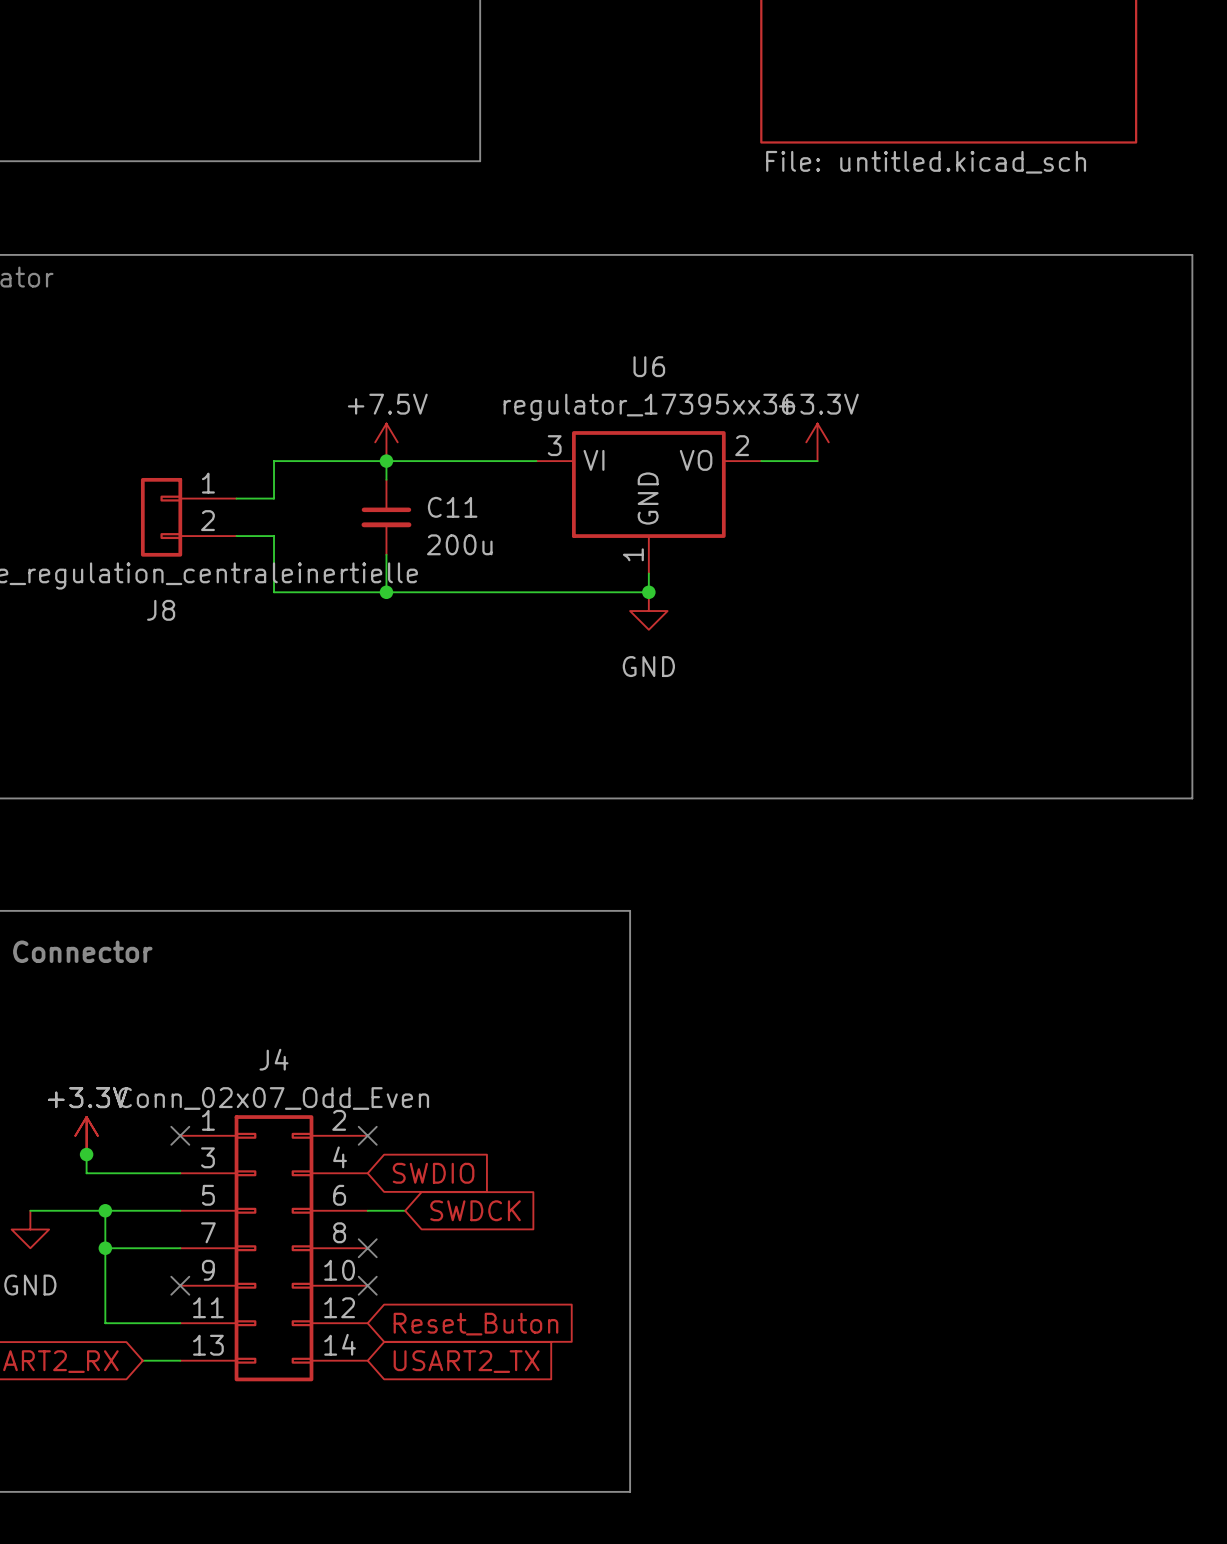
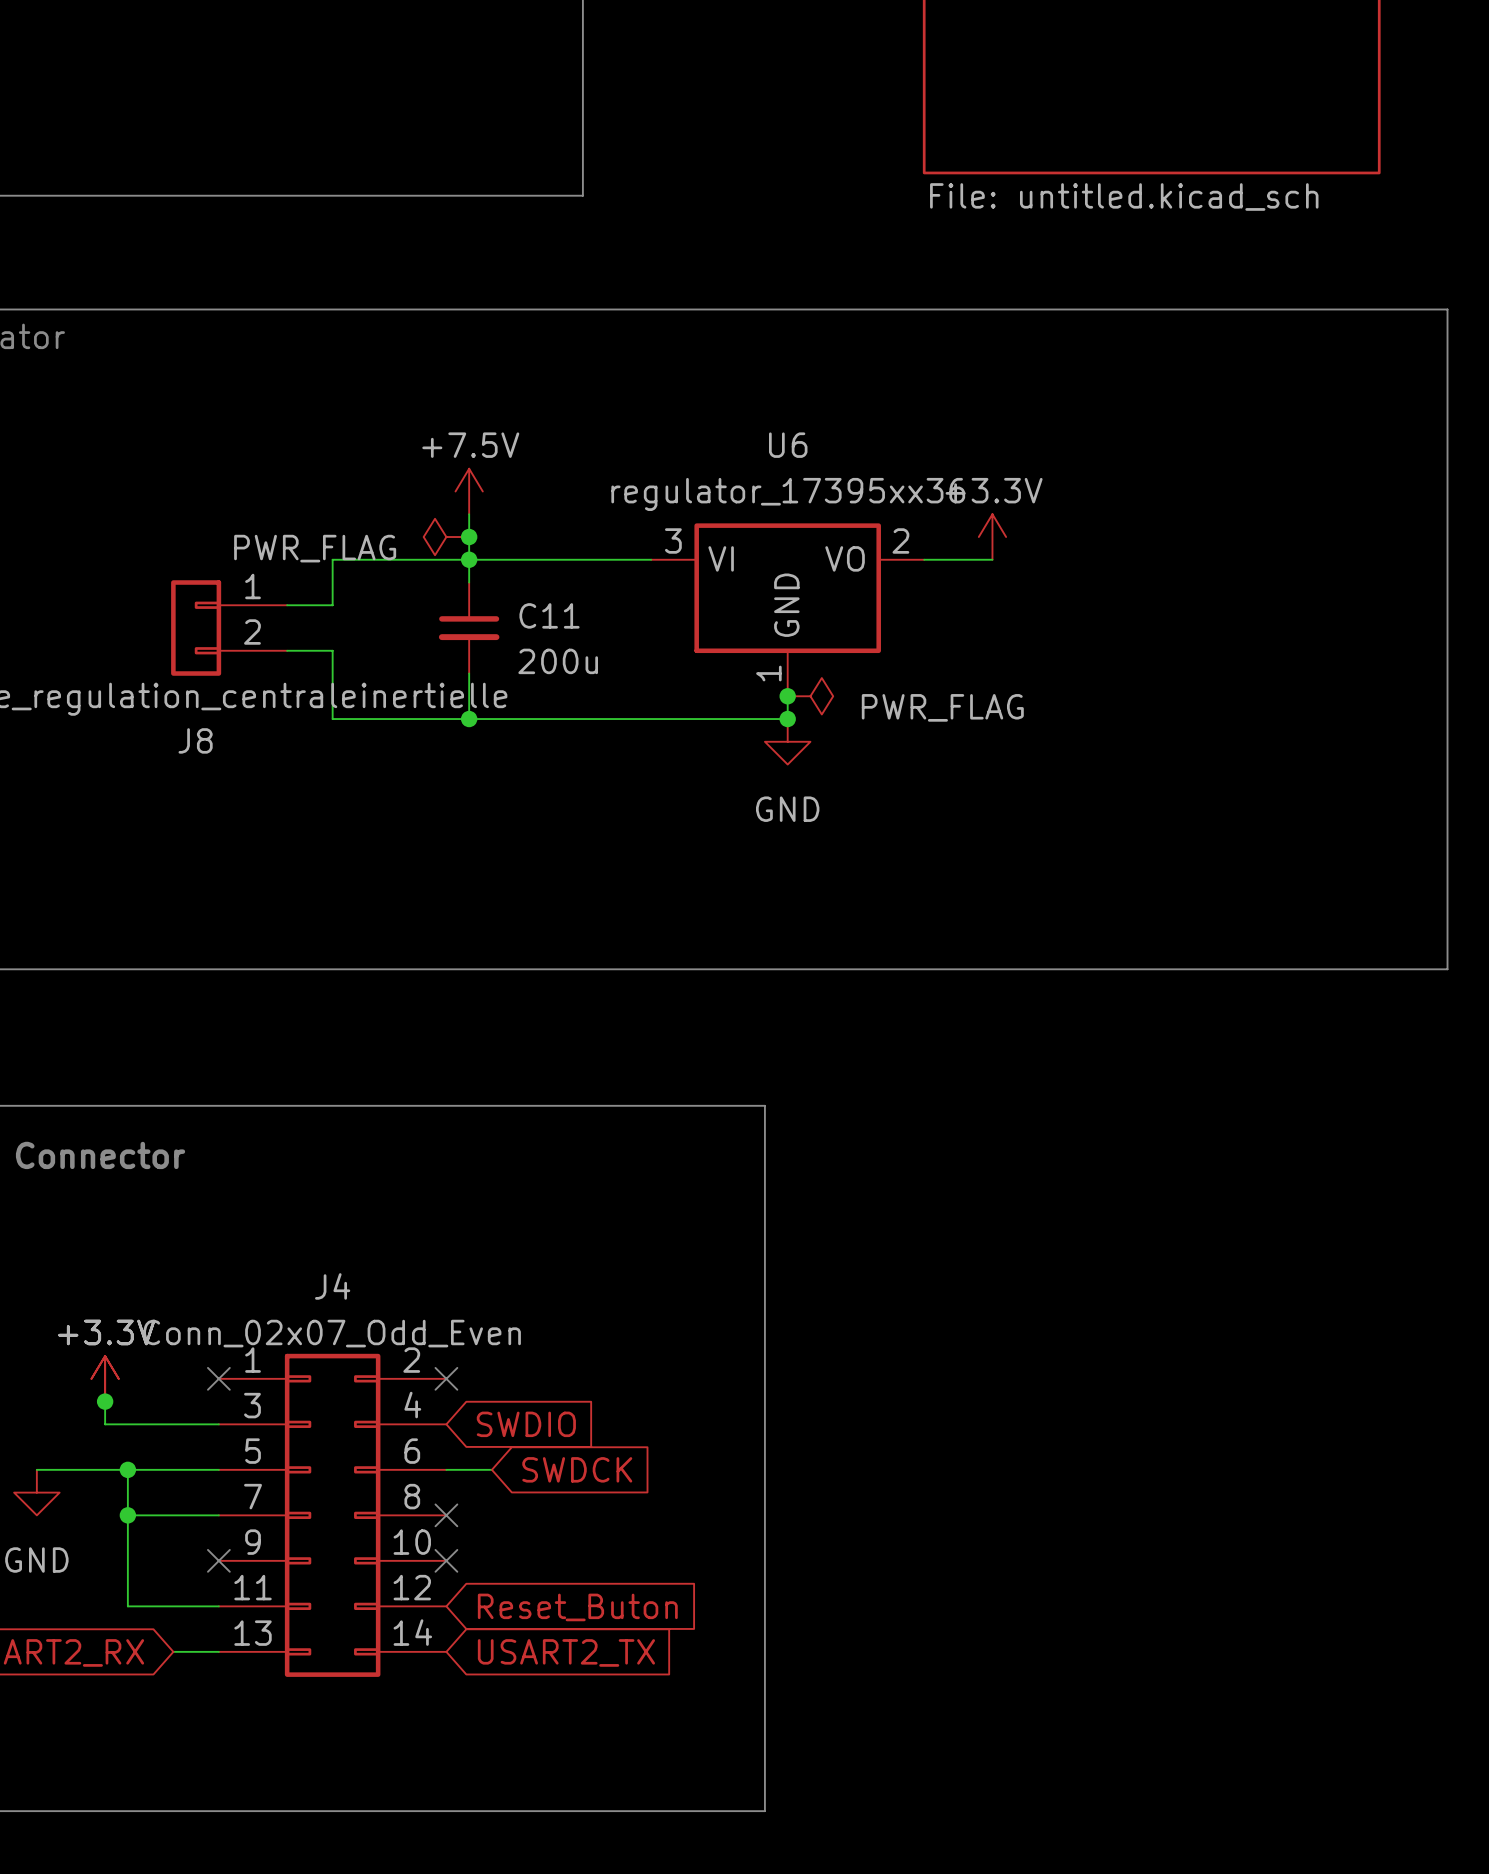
power symbol: none -> PWR_FLAG (446, 537)
power symbol position: +7.5V (386, 442) -> +7.5V (469, 491)
junction: none -> (469, 537)
junction: none -> (787, 696)
power symbol: none -> PWR_FLAG (810, 696)

